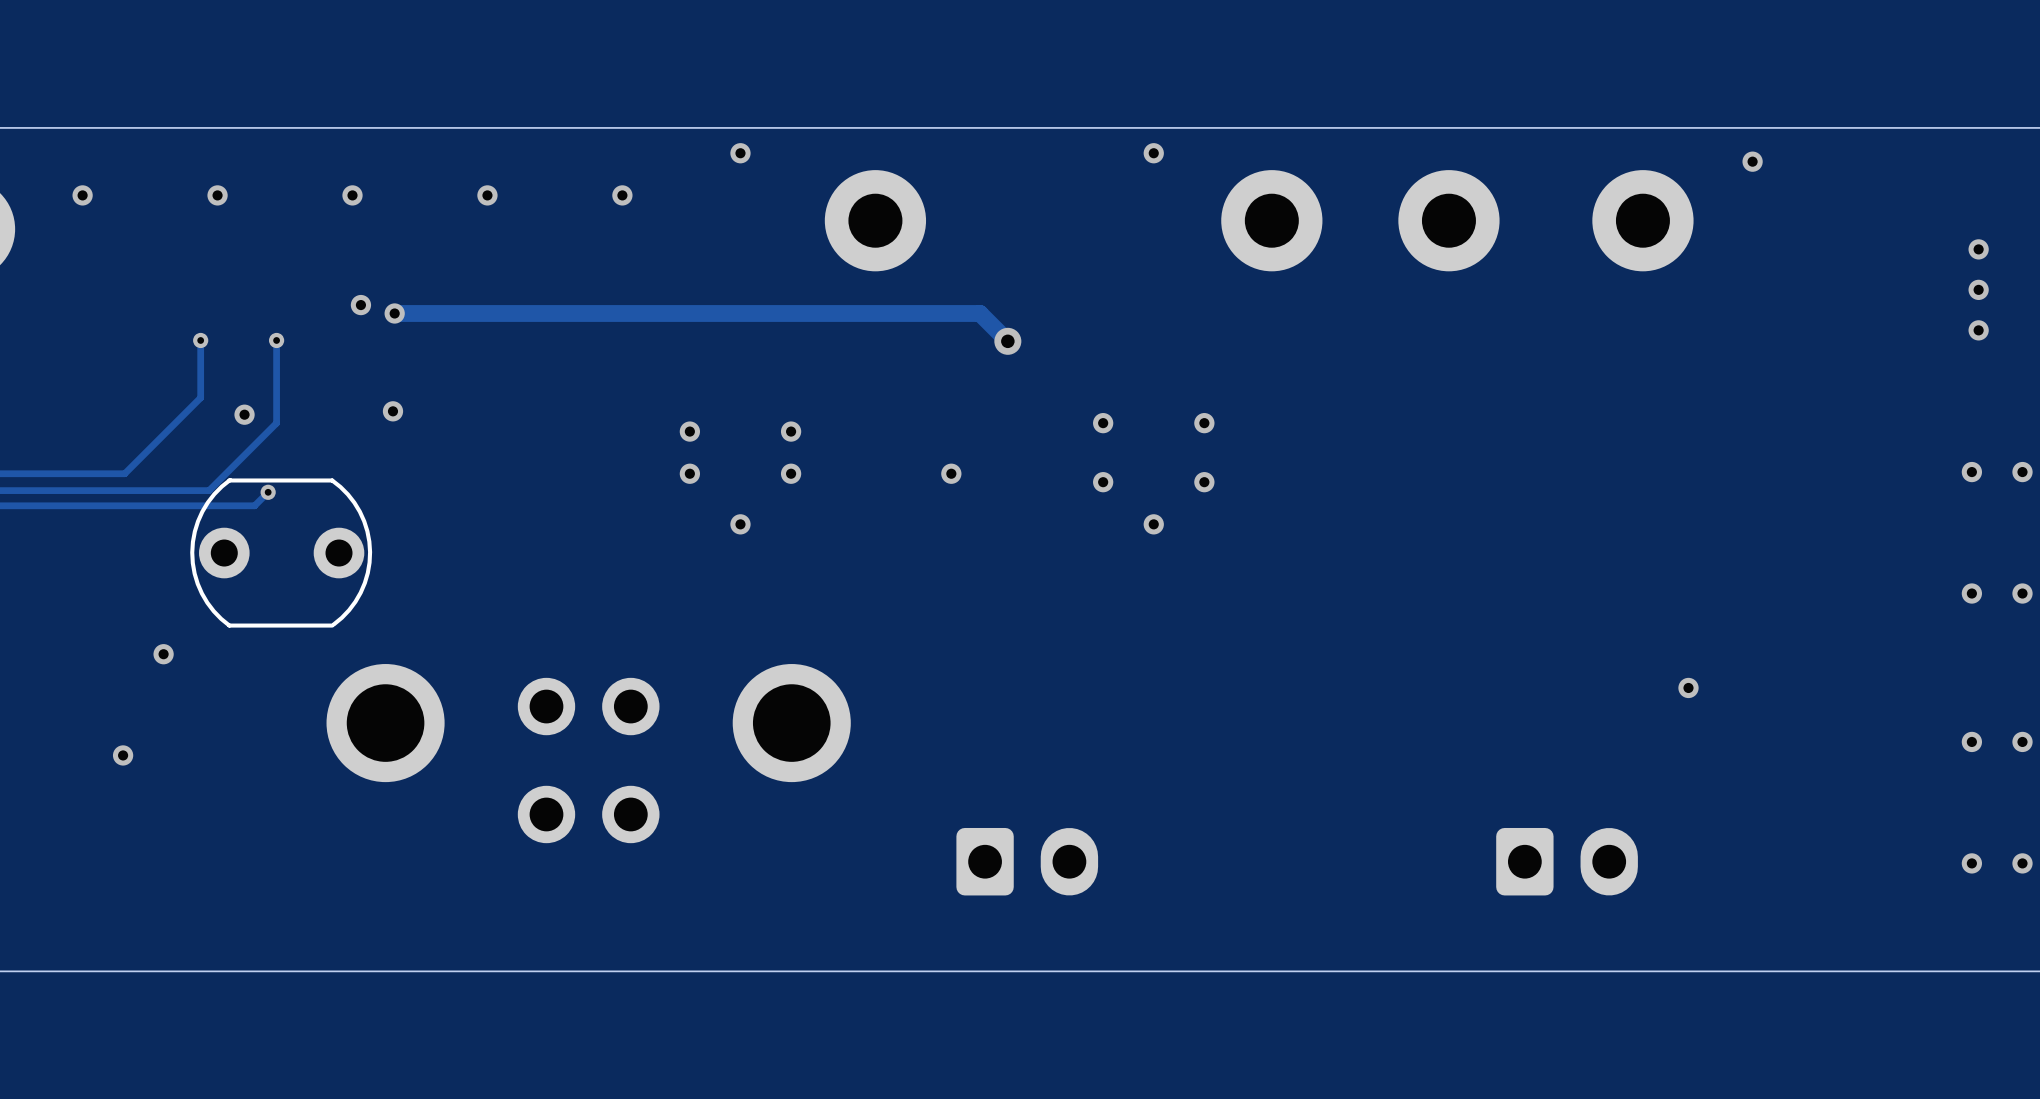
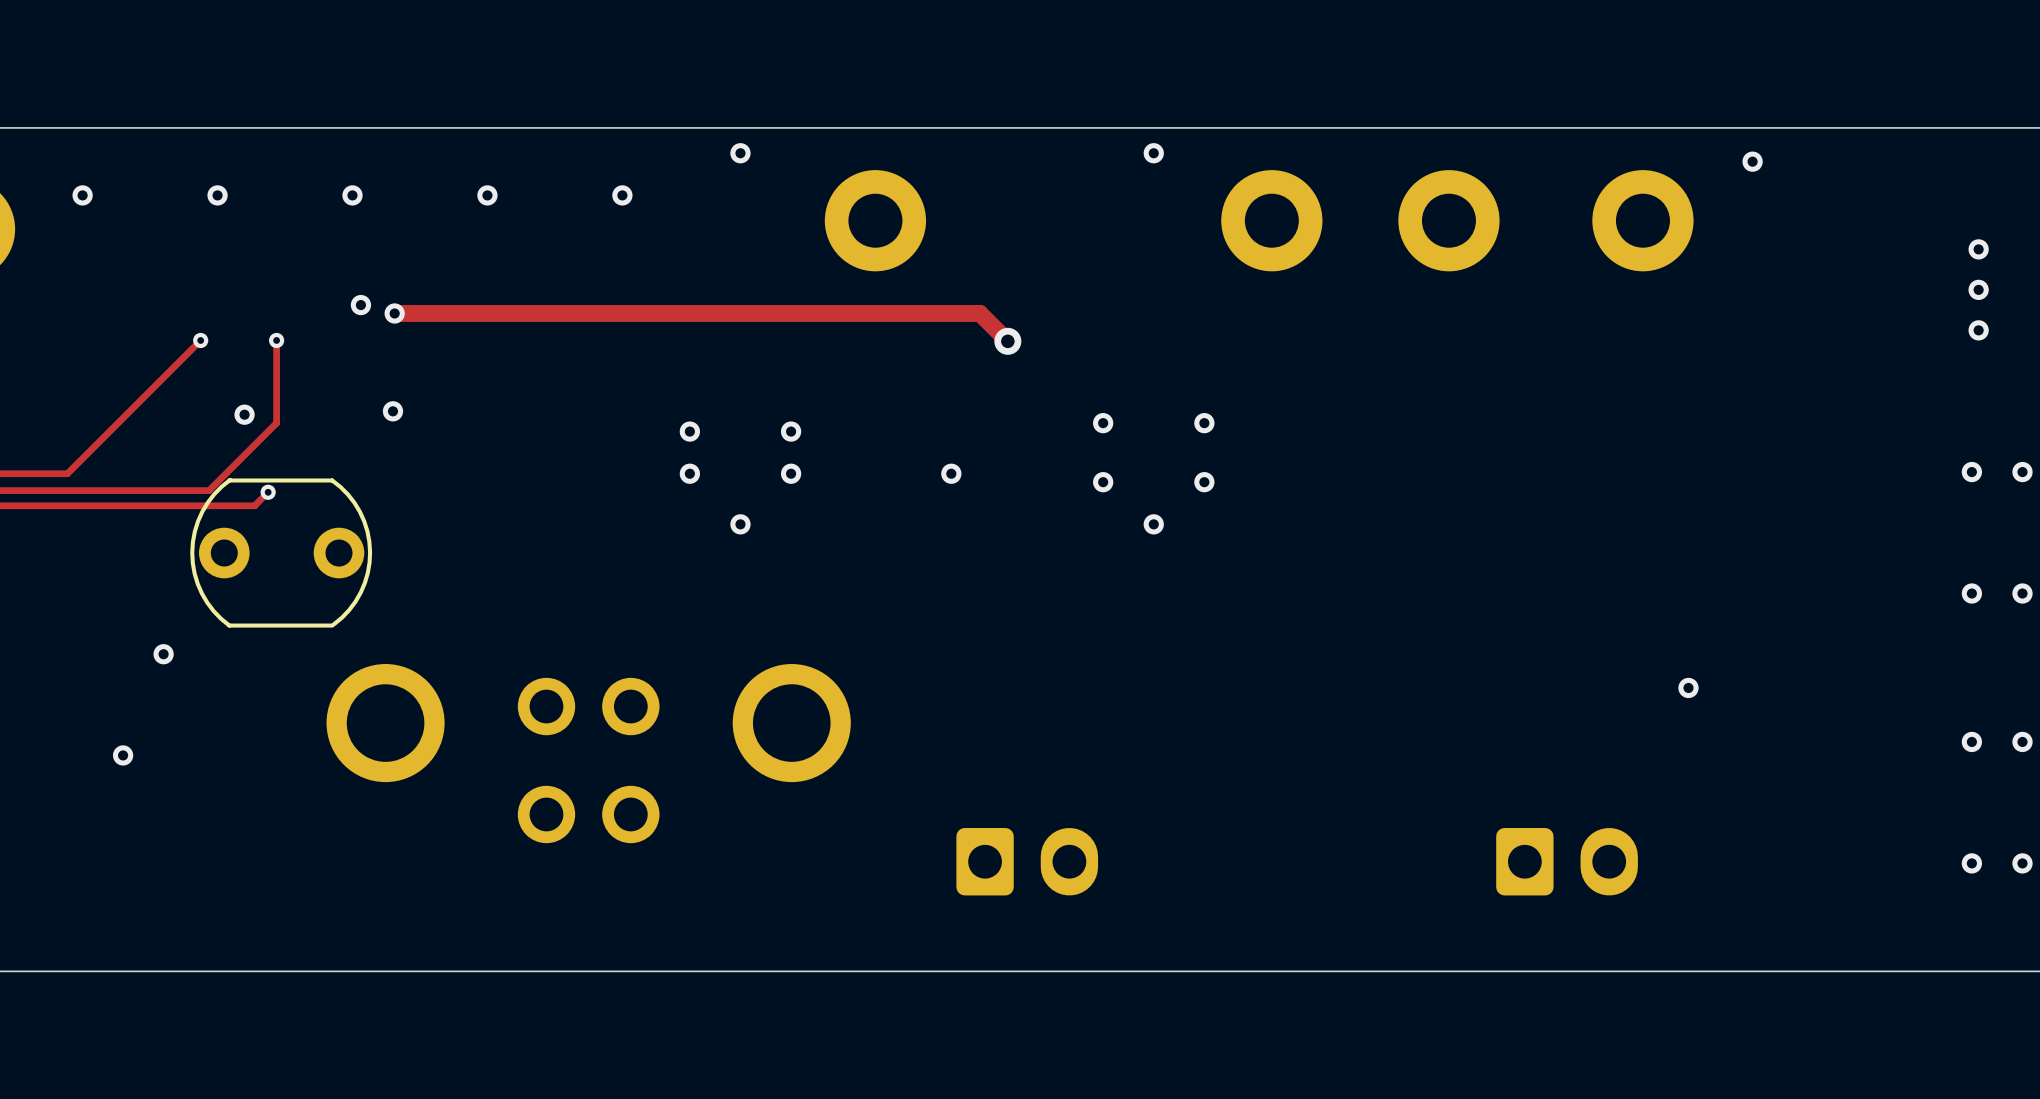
track: (200, 340) (200, 397) (124, 473) (67, 473) -> (200, 340) (67, 473)

